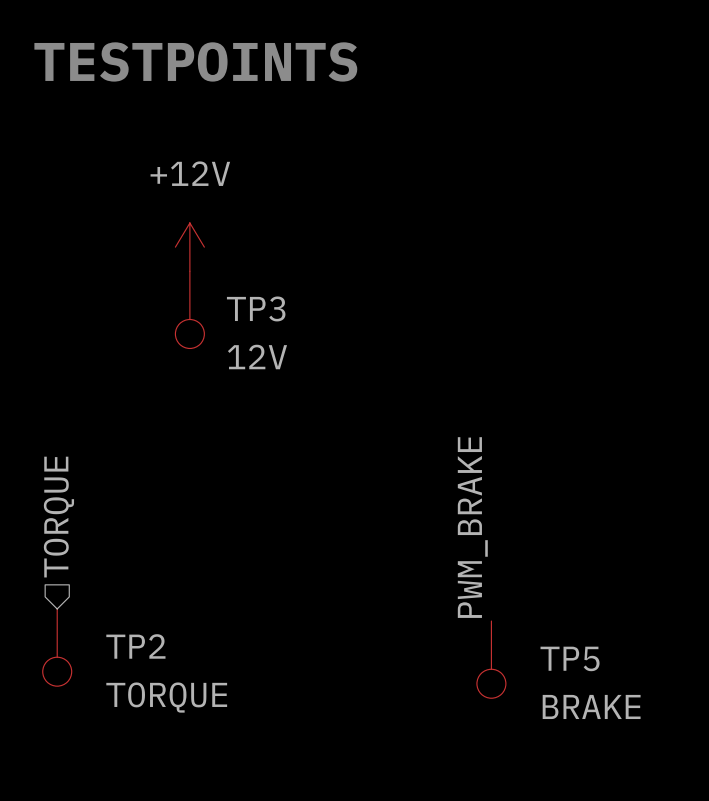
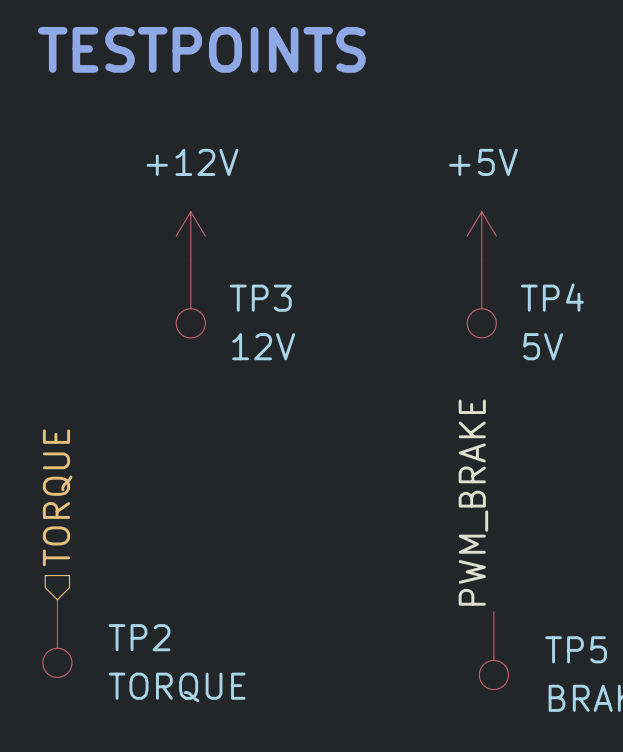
power symbol: none -> +5V (481, 236)
TP4: none -> 5V (481, 299)

